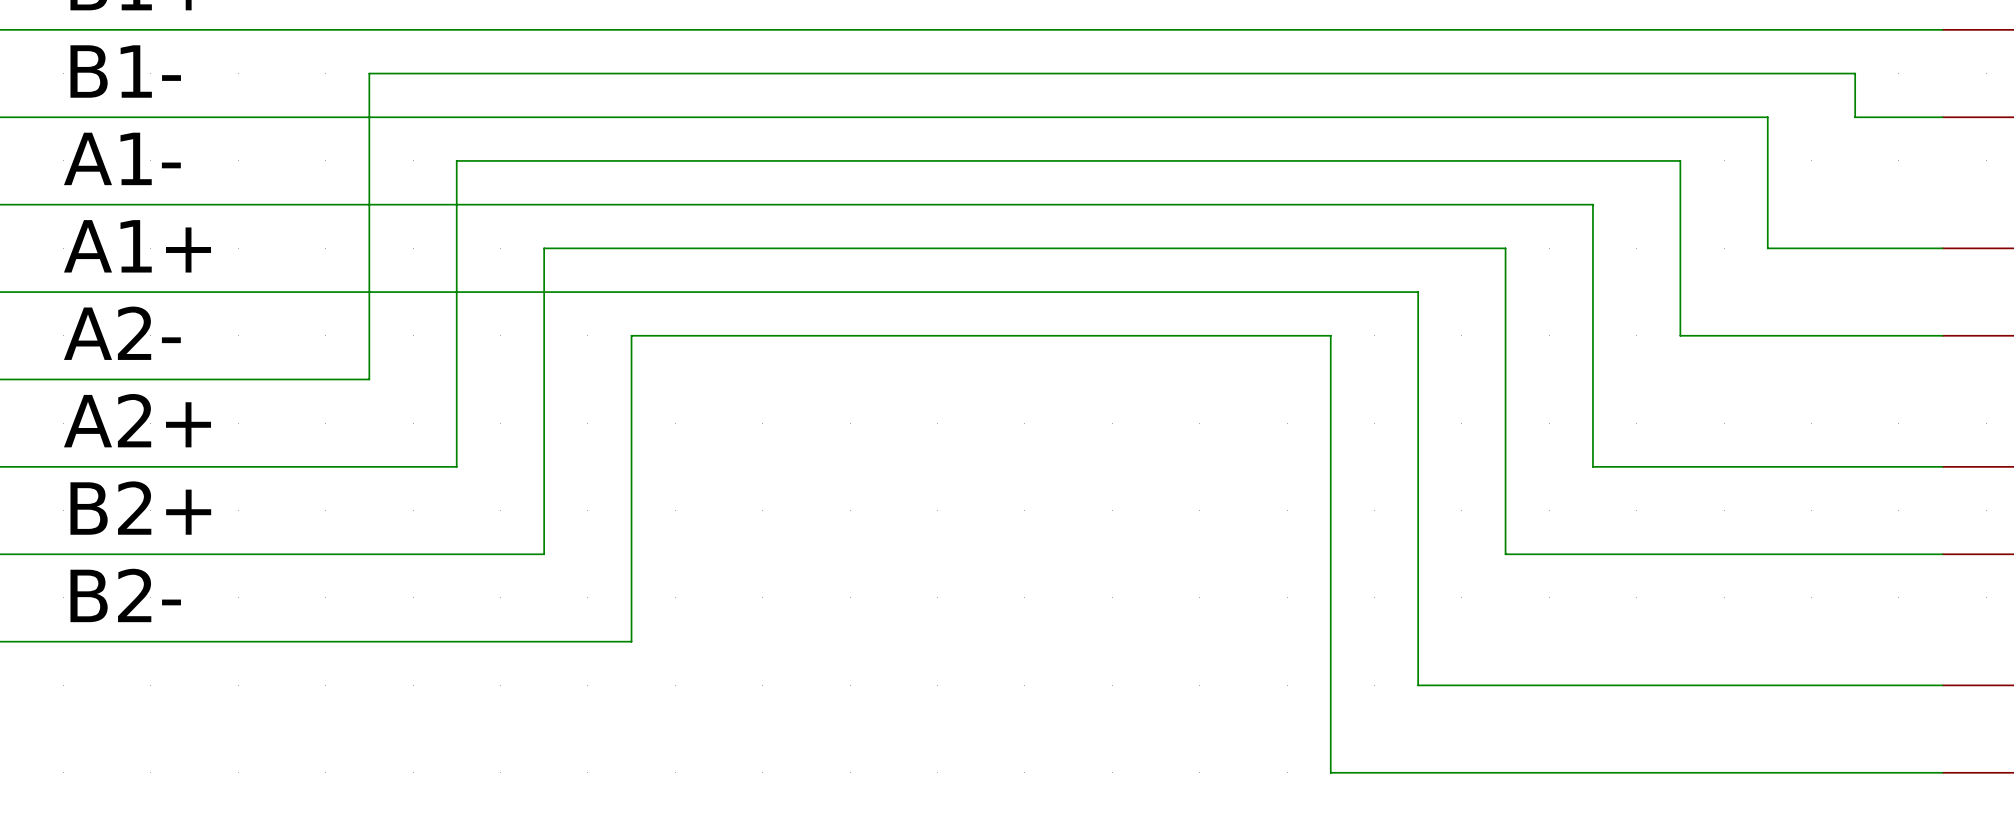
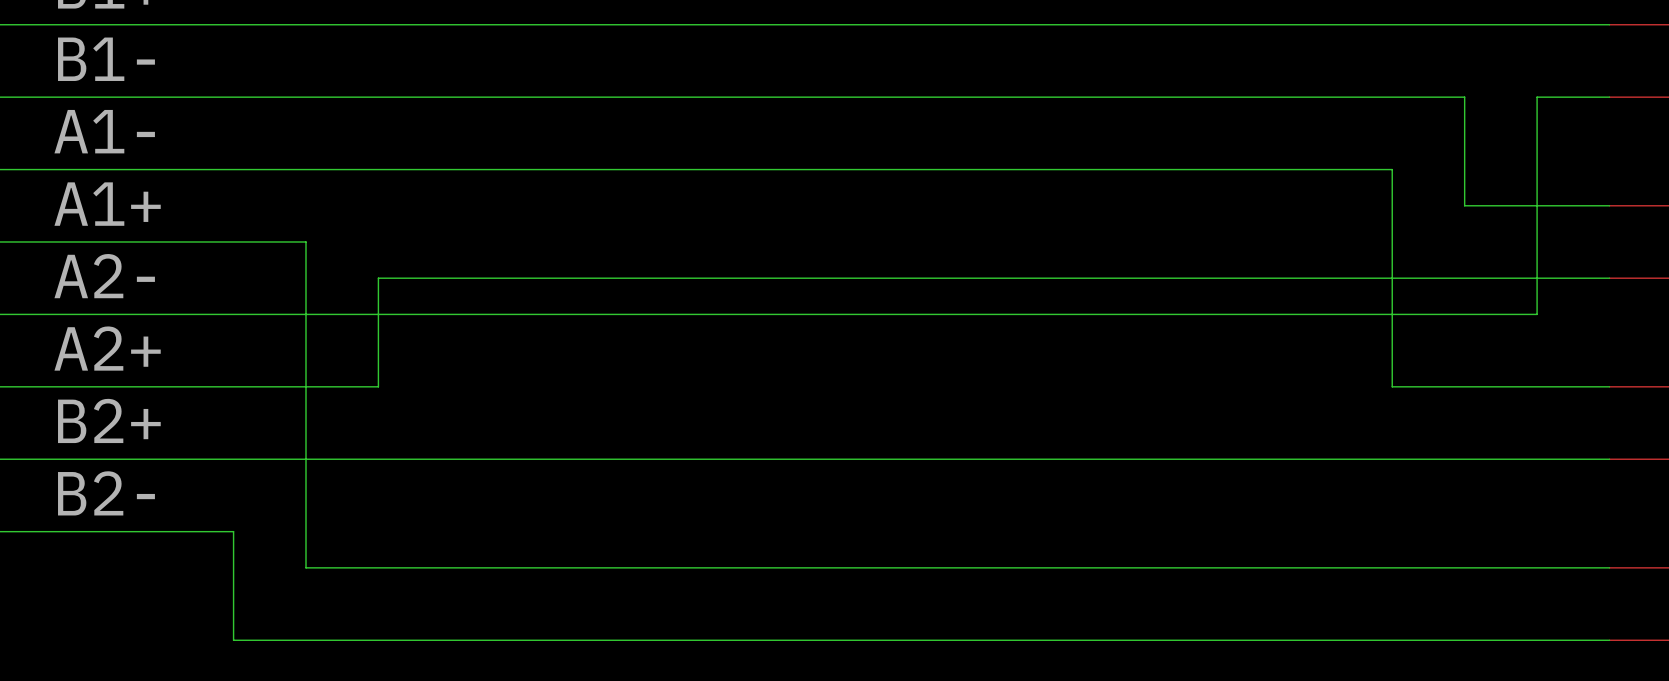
wire: (1855, 117) (1855, 73) (369, 73) (369, 292) (1418, 292) (1418, 685) -> (1537, 97) (1537, 314) (306, 314) (306, 567) (1174, 567)
wire: (1592, 204) (1592, 466) (1680, 466) -> (1319, 169) (1392, 169)
wire: (1680, 204) (1680, 160) (456, 160) (456, 335) -> none
wire: (631, 335) (631, 641) (281, 641) -> (523, 278) (378, 278)
wire: (1330, 335) (1330, 772) -> (1102, 278) (1392, 278) (1392, 386)
wire: (544, 554) (544, 248) (1505, 248) (1505, 554) -> (450, 459) (1247, 459)
wire: none -> (233, 531) (233, 640) (1102, 640)

